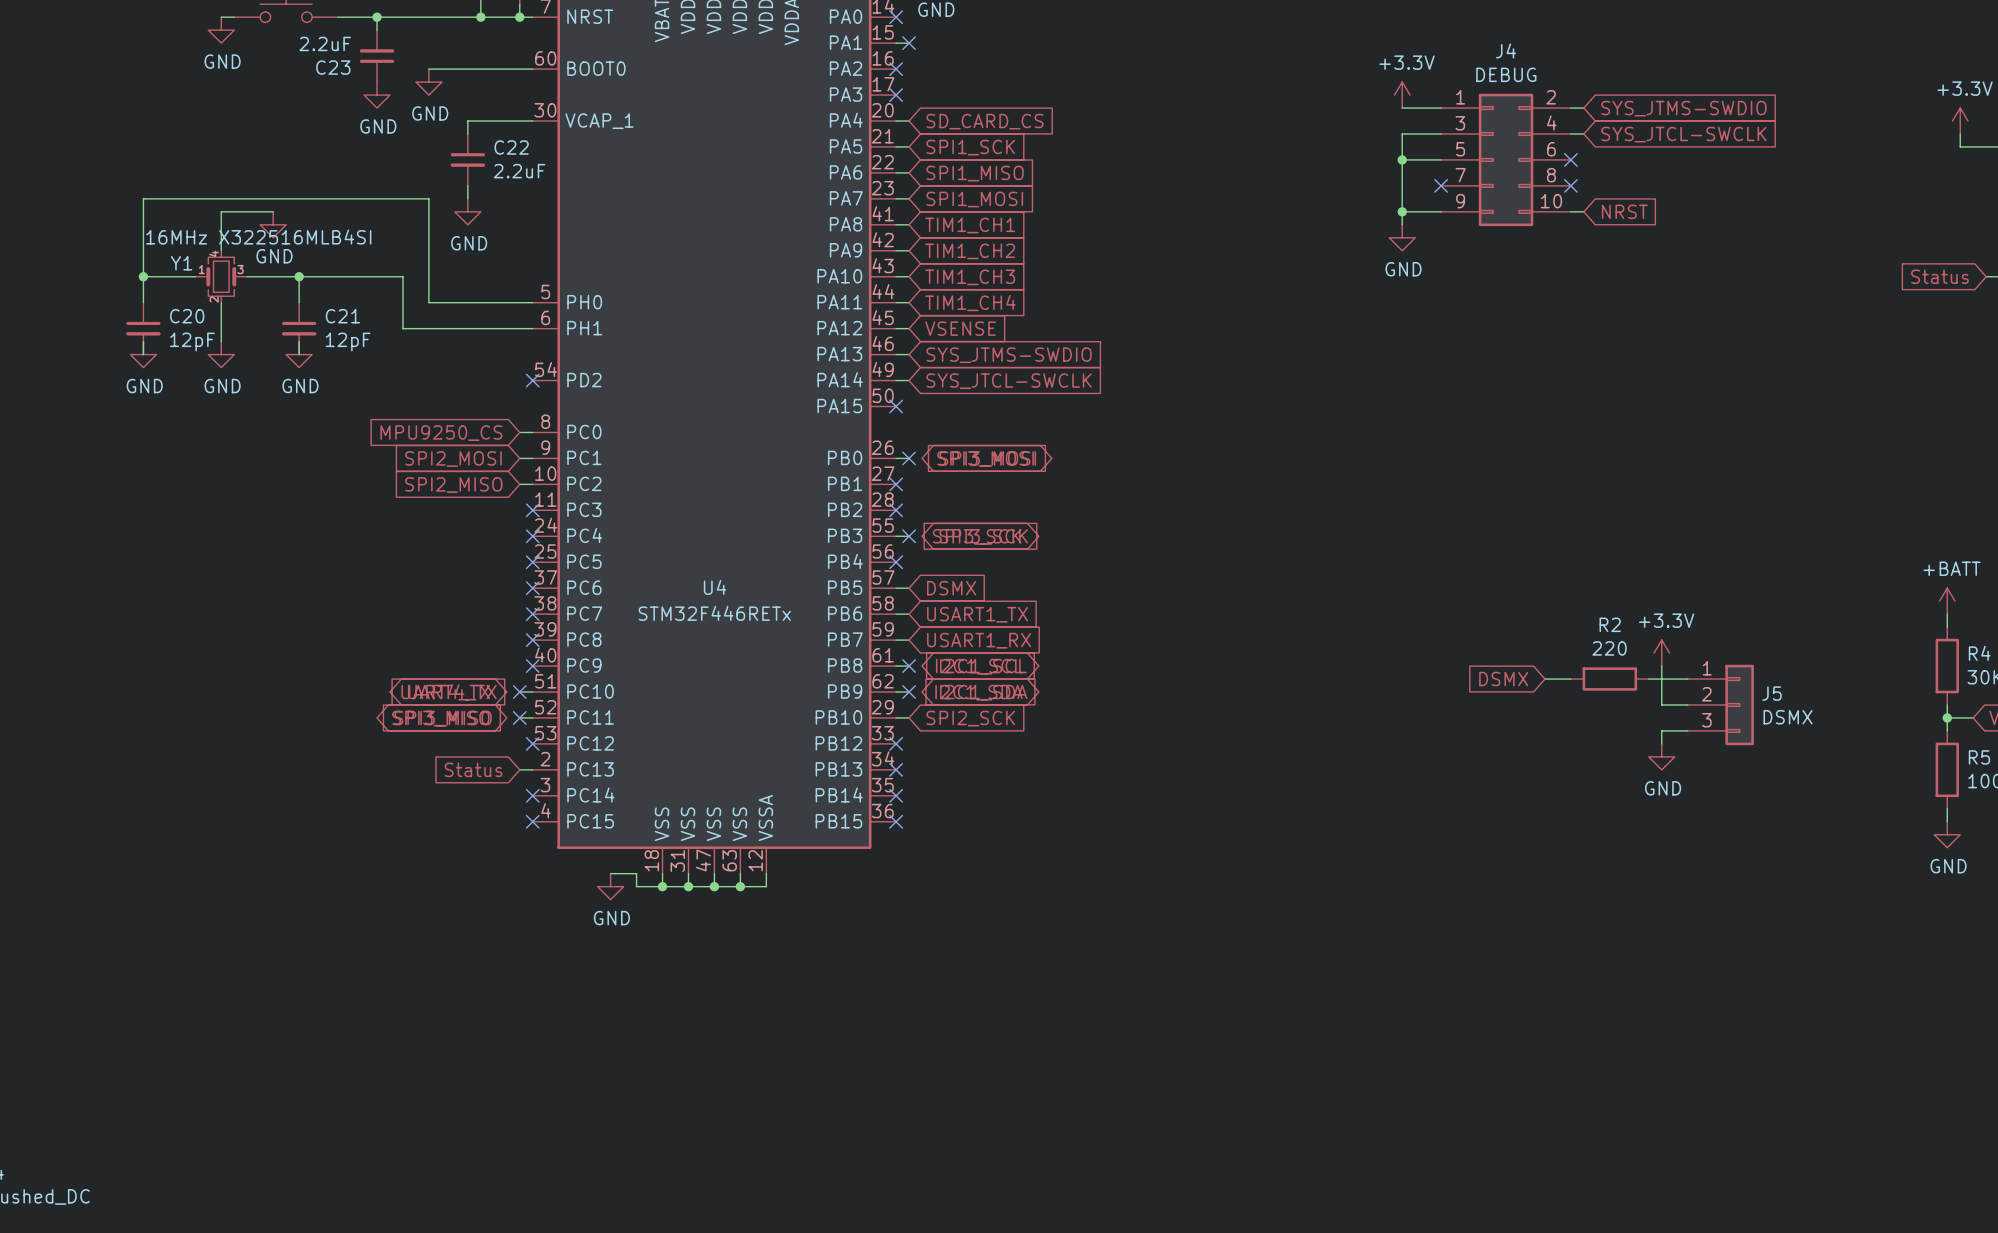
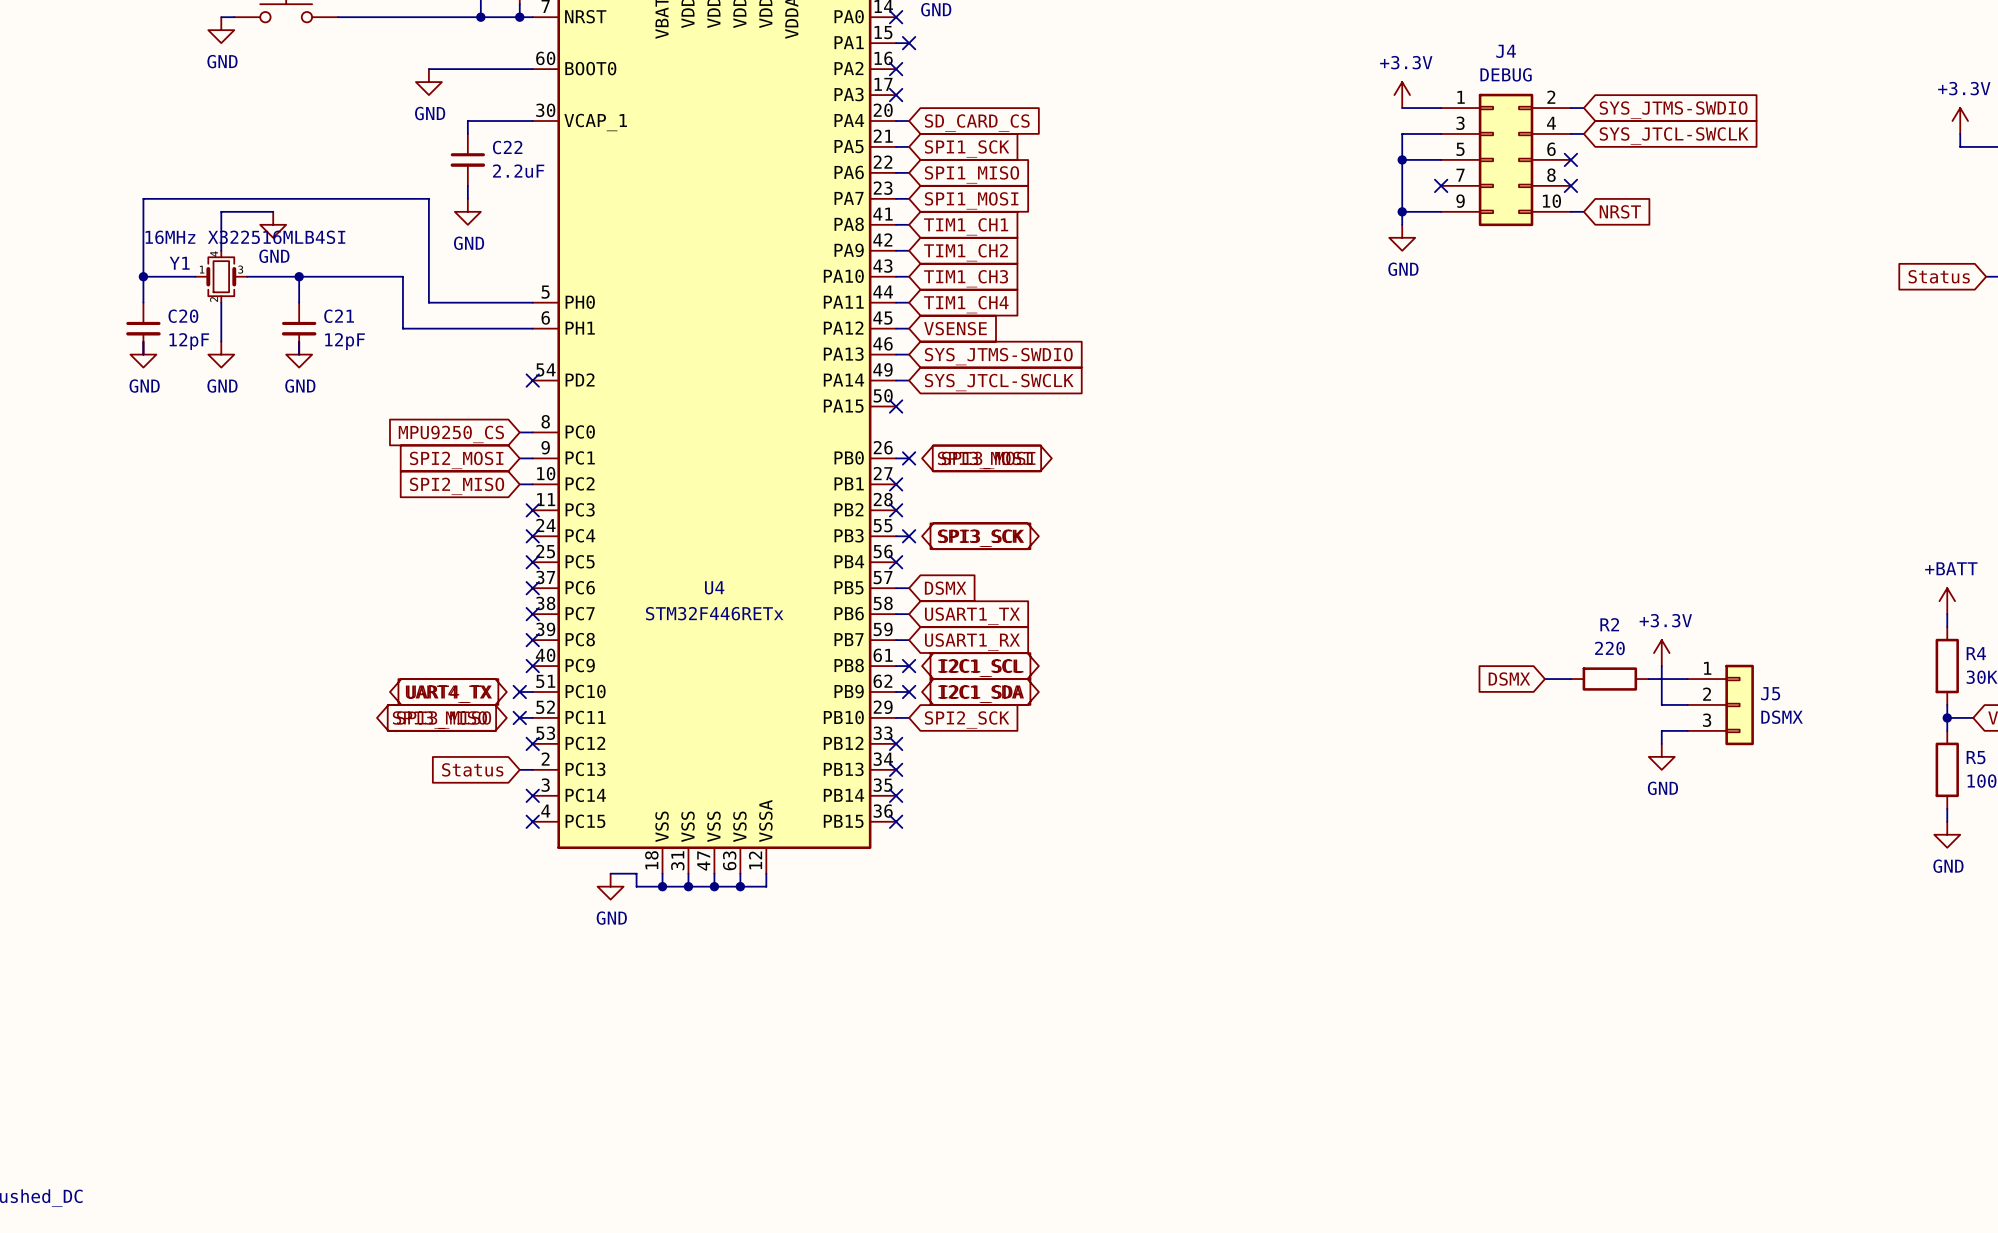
wire: (377, 17) (377, 30) -> none
junction: (377, 17) -> none
C23: 2.2uF (377, 56) -> none
power symbol: GND (377, 95) -> none

